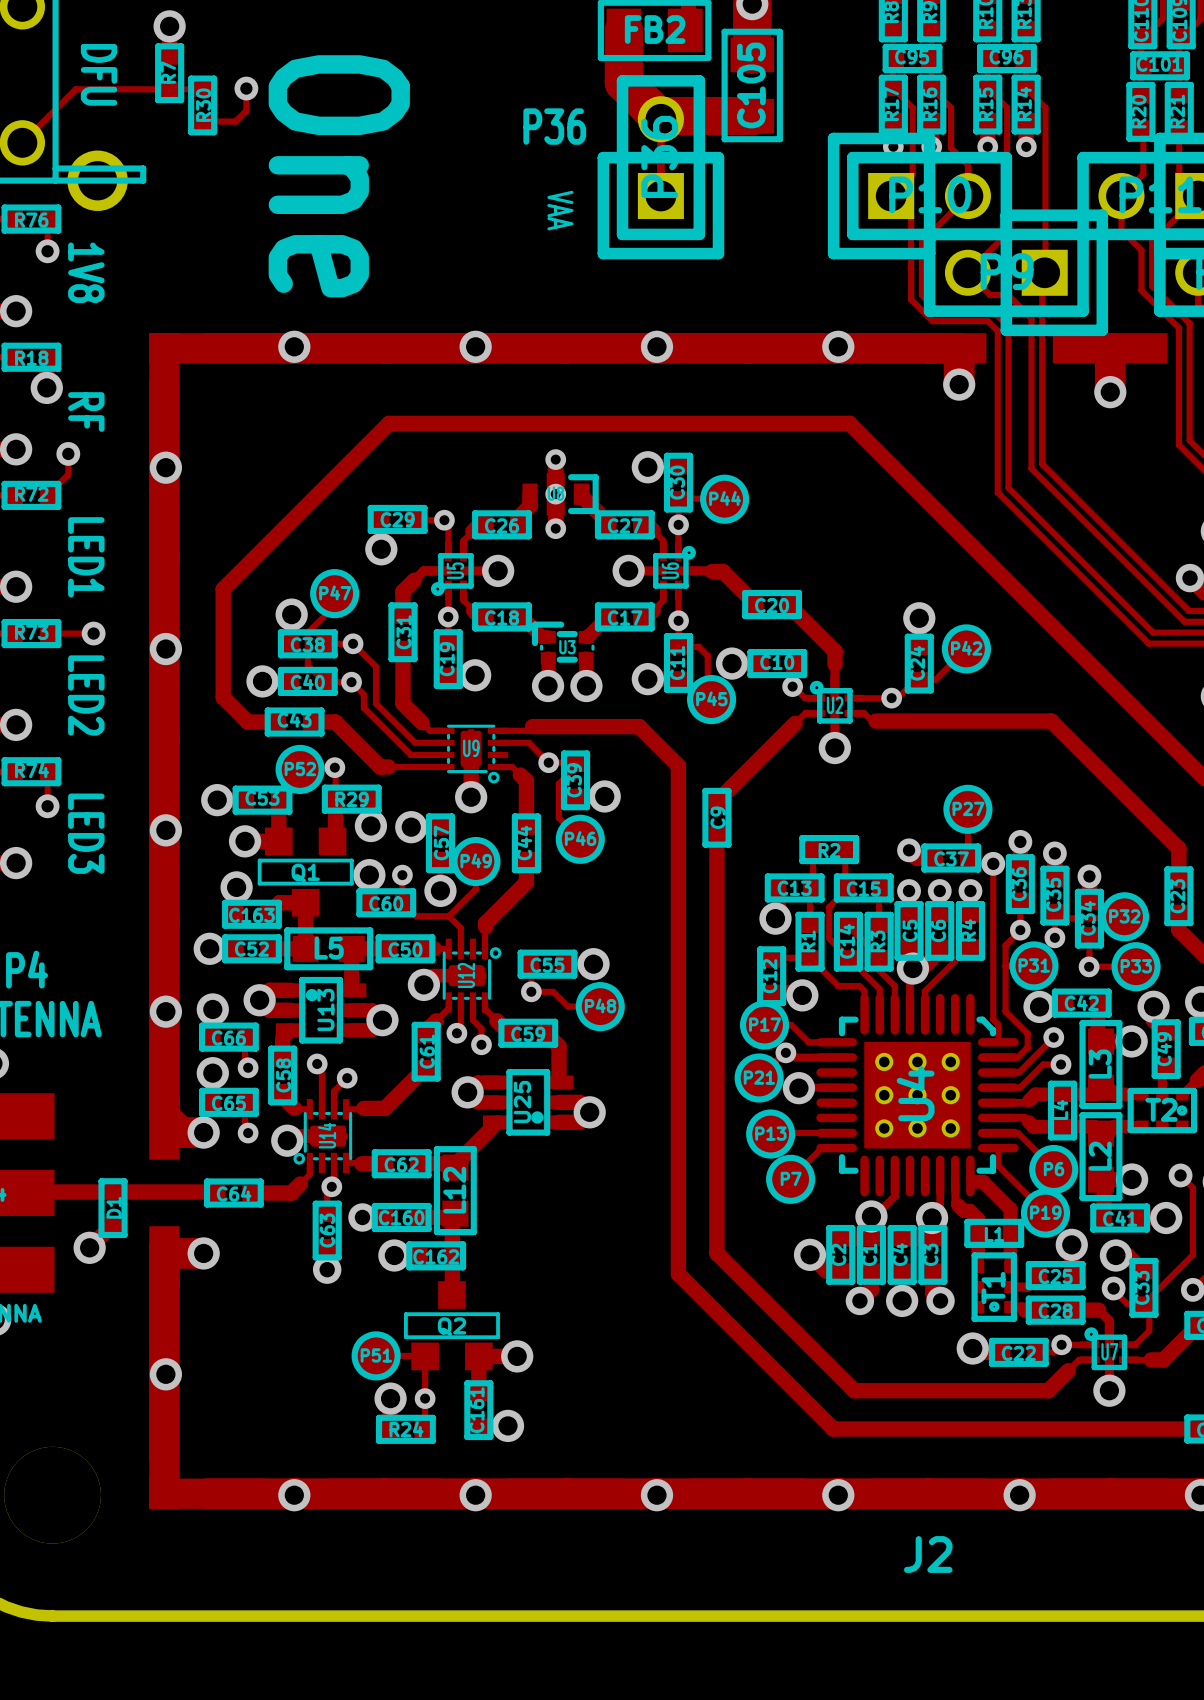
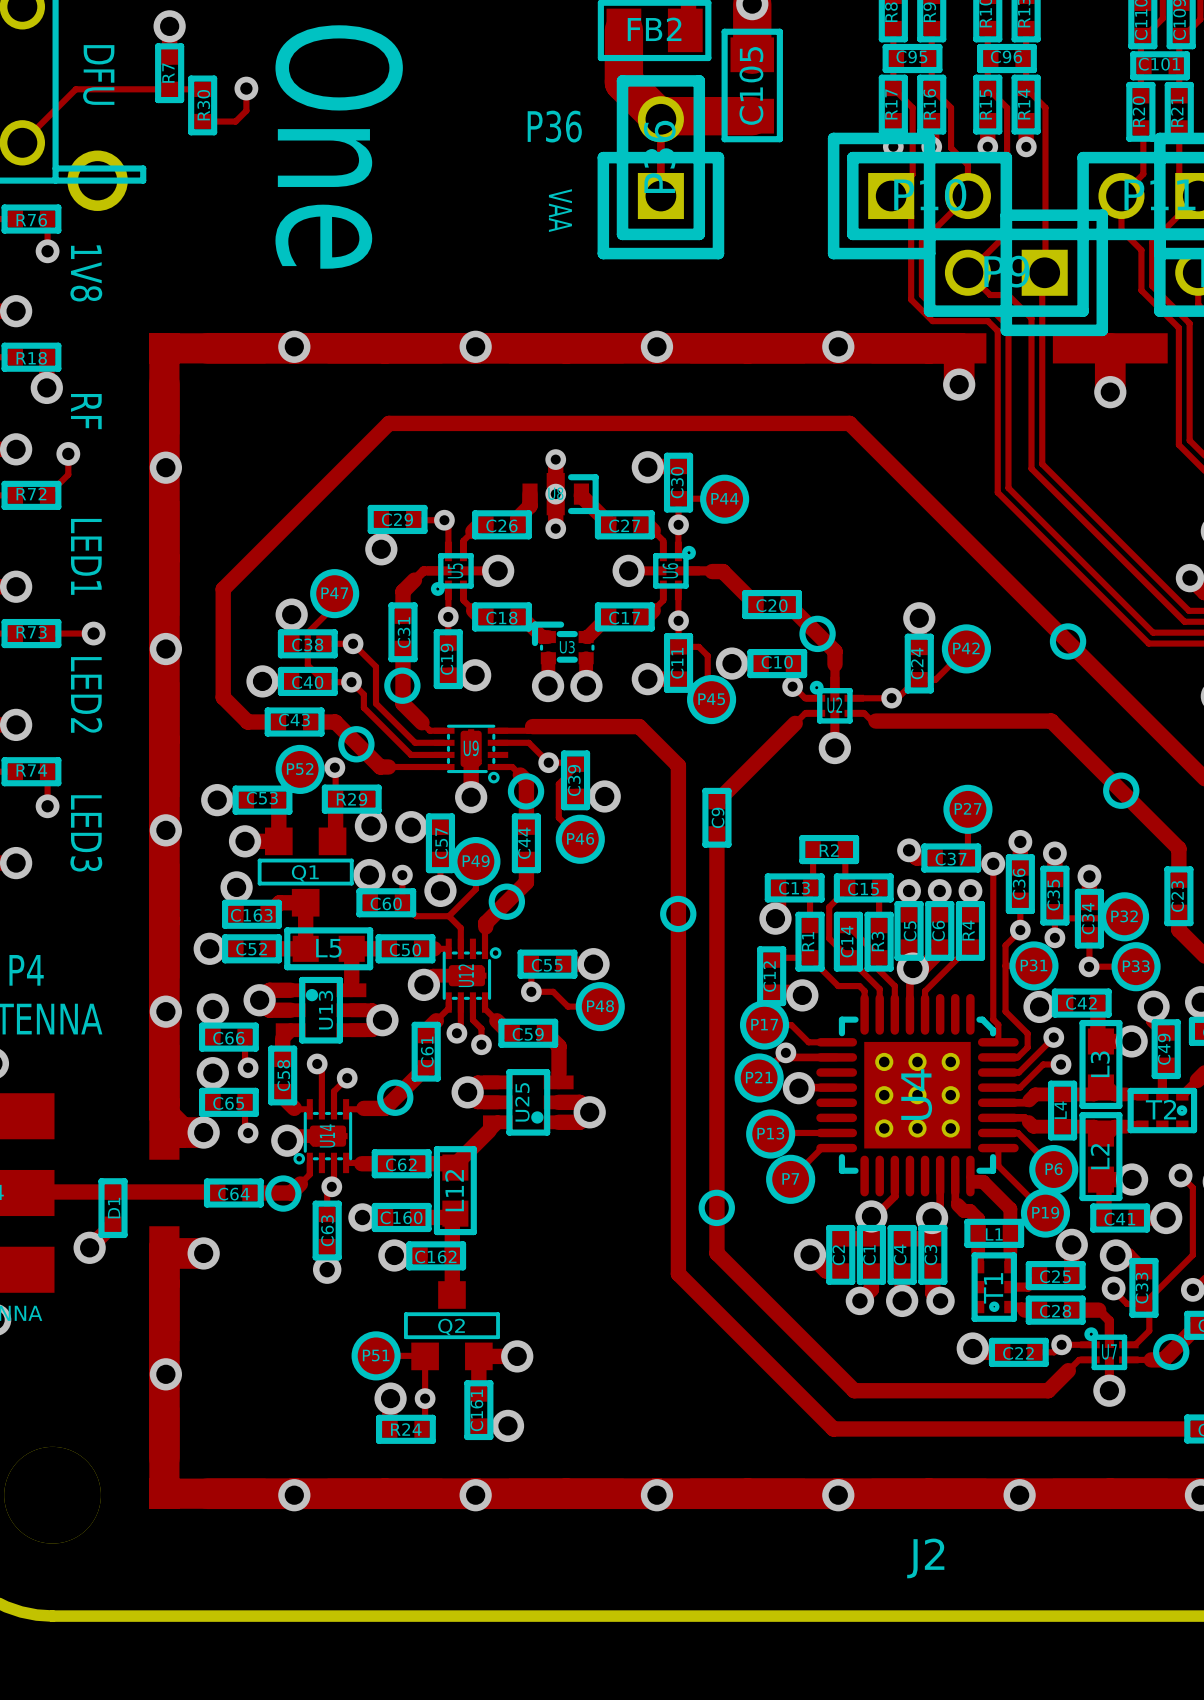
drawing: none -> [799, 615, 836, 653]
drawing: none -> [1049, 623, 1087, 660]
drawing: none -> [338, 667, 421, 763]
drawing: none -> [1103, 772, 1140, 809]
drawing: none -> [507, 773, 545, 810]
drawing: none -> [488, 883, 526, 920]
drawing: none -> [660, 895, 697, 933]
drawing: none -> [377, 1079, 414, 1116]
drawing: none -> [265, 1175, 302, 1212]
drawing: none -> [698, 1189, 735, 1227]
drawing: none -> [1153, 1333, 1190, 1371]

